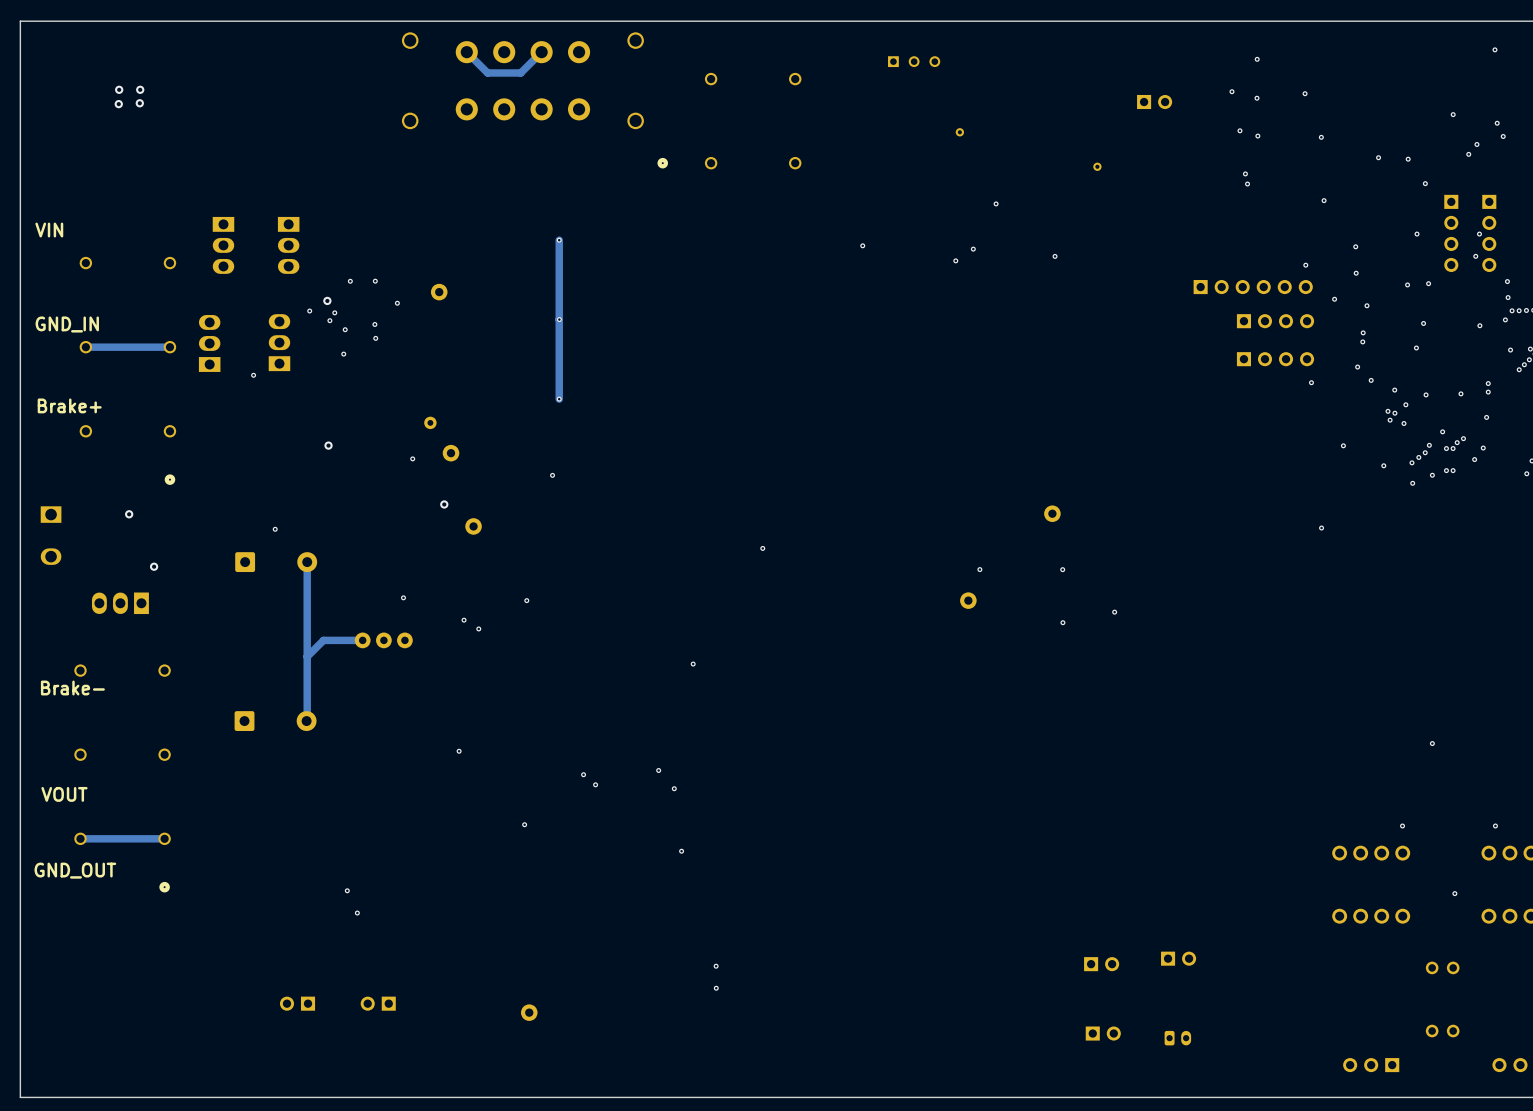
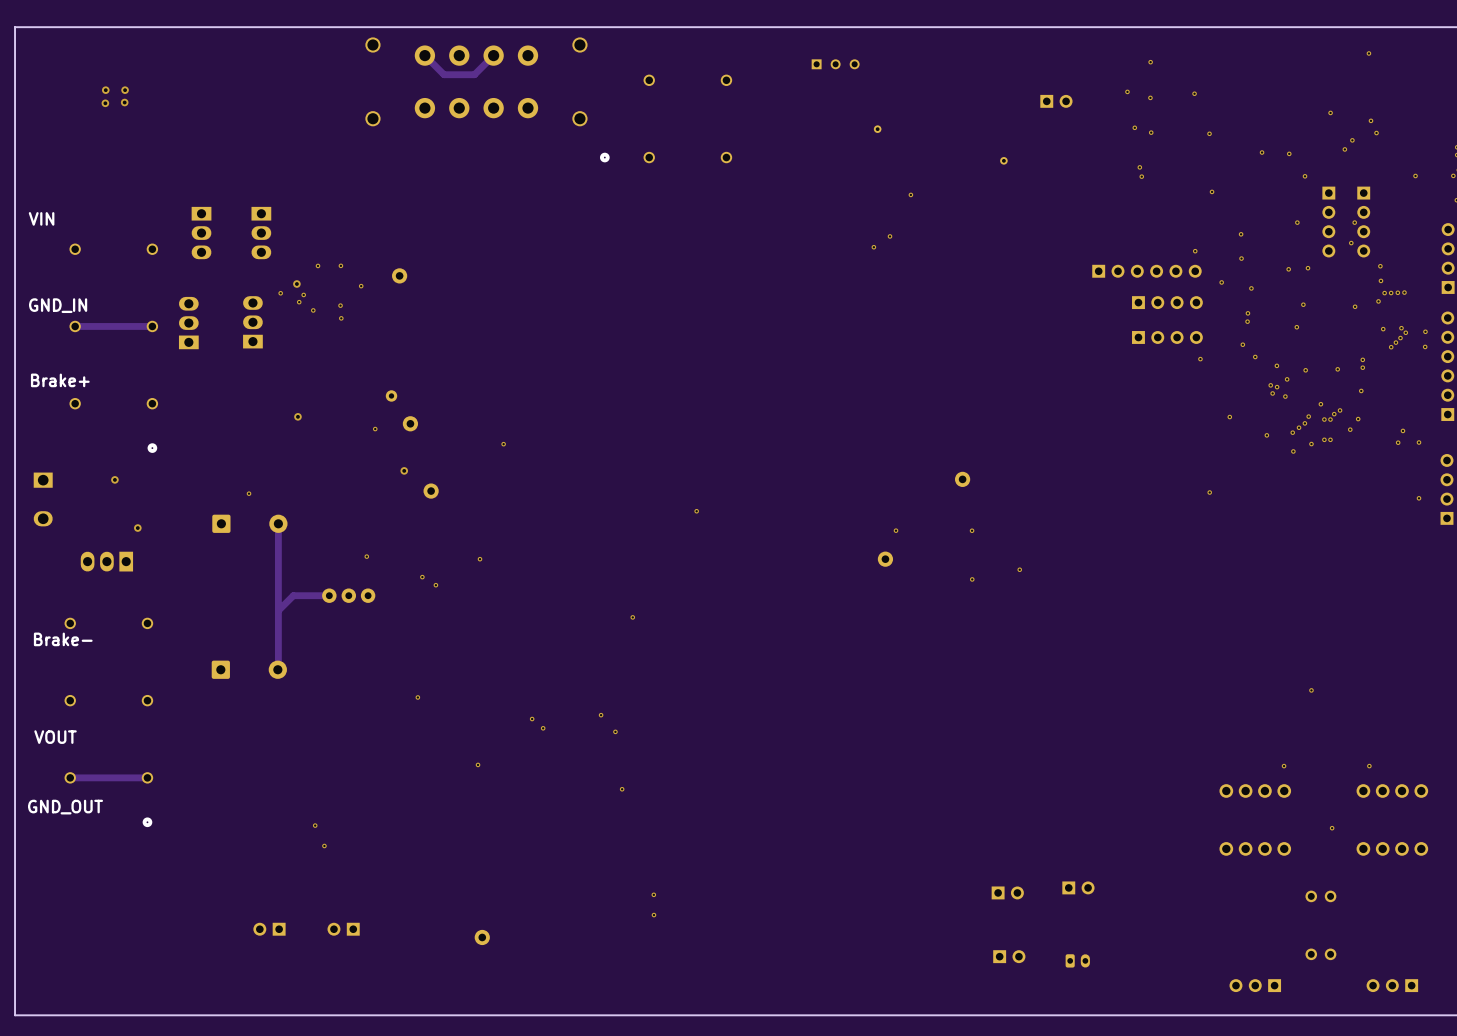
track: (559, 240) (559, 399) -> none
via: (559, 240) -> none
via: (862, 245) -> none
via: (1055, 256) -> none
via: (559, 319) -> none
via: (343, 354) -> none
via: (253, 375) -> none
via: (559, 399) -> none

